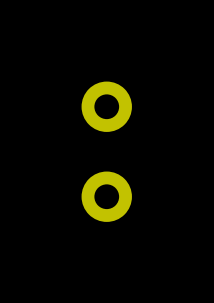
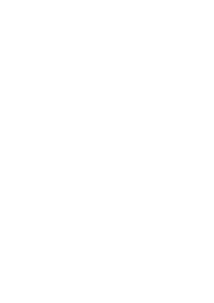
part: (106, 151) -> none

